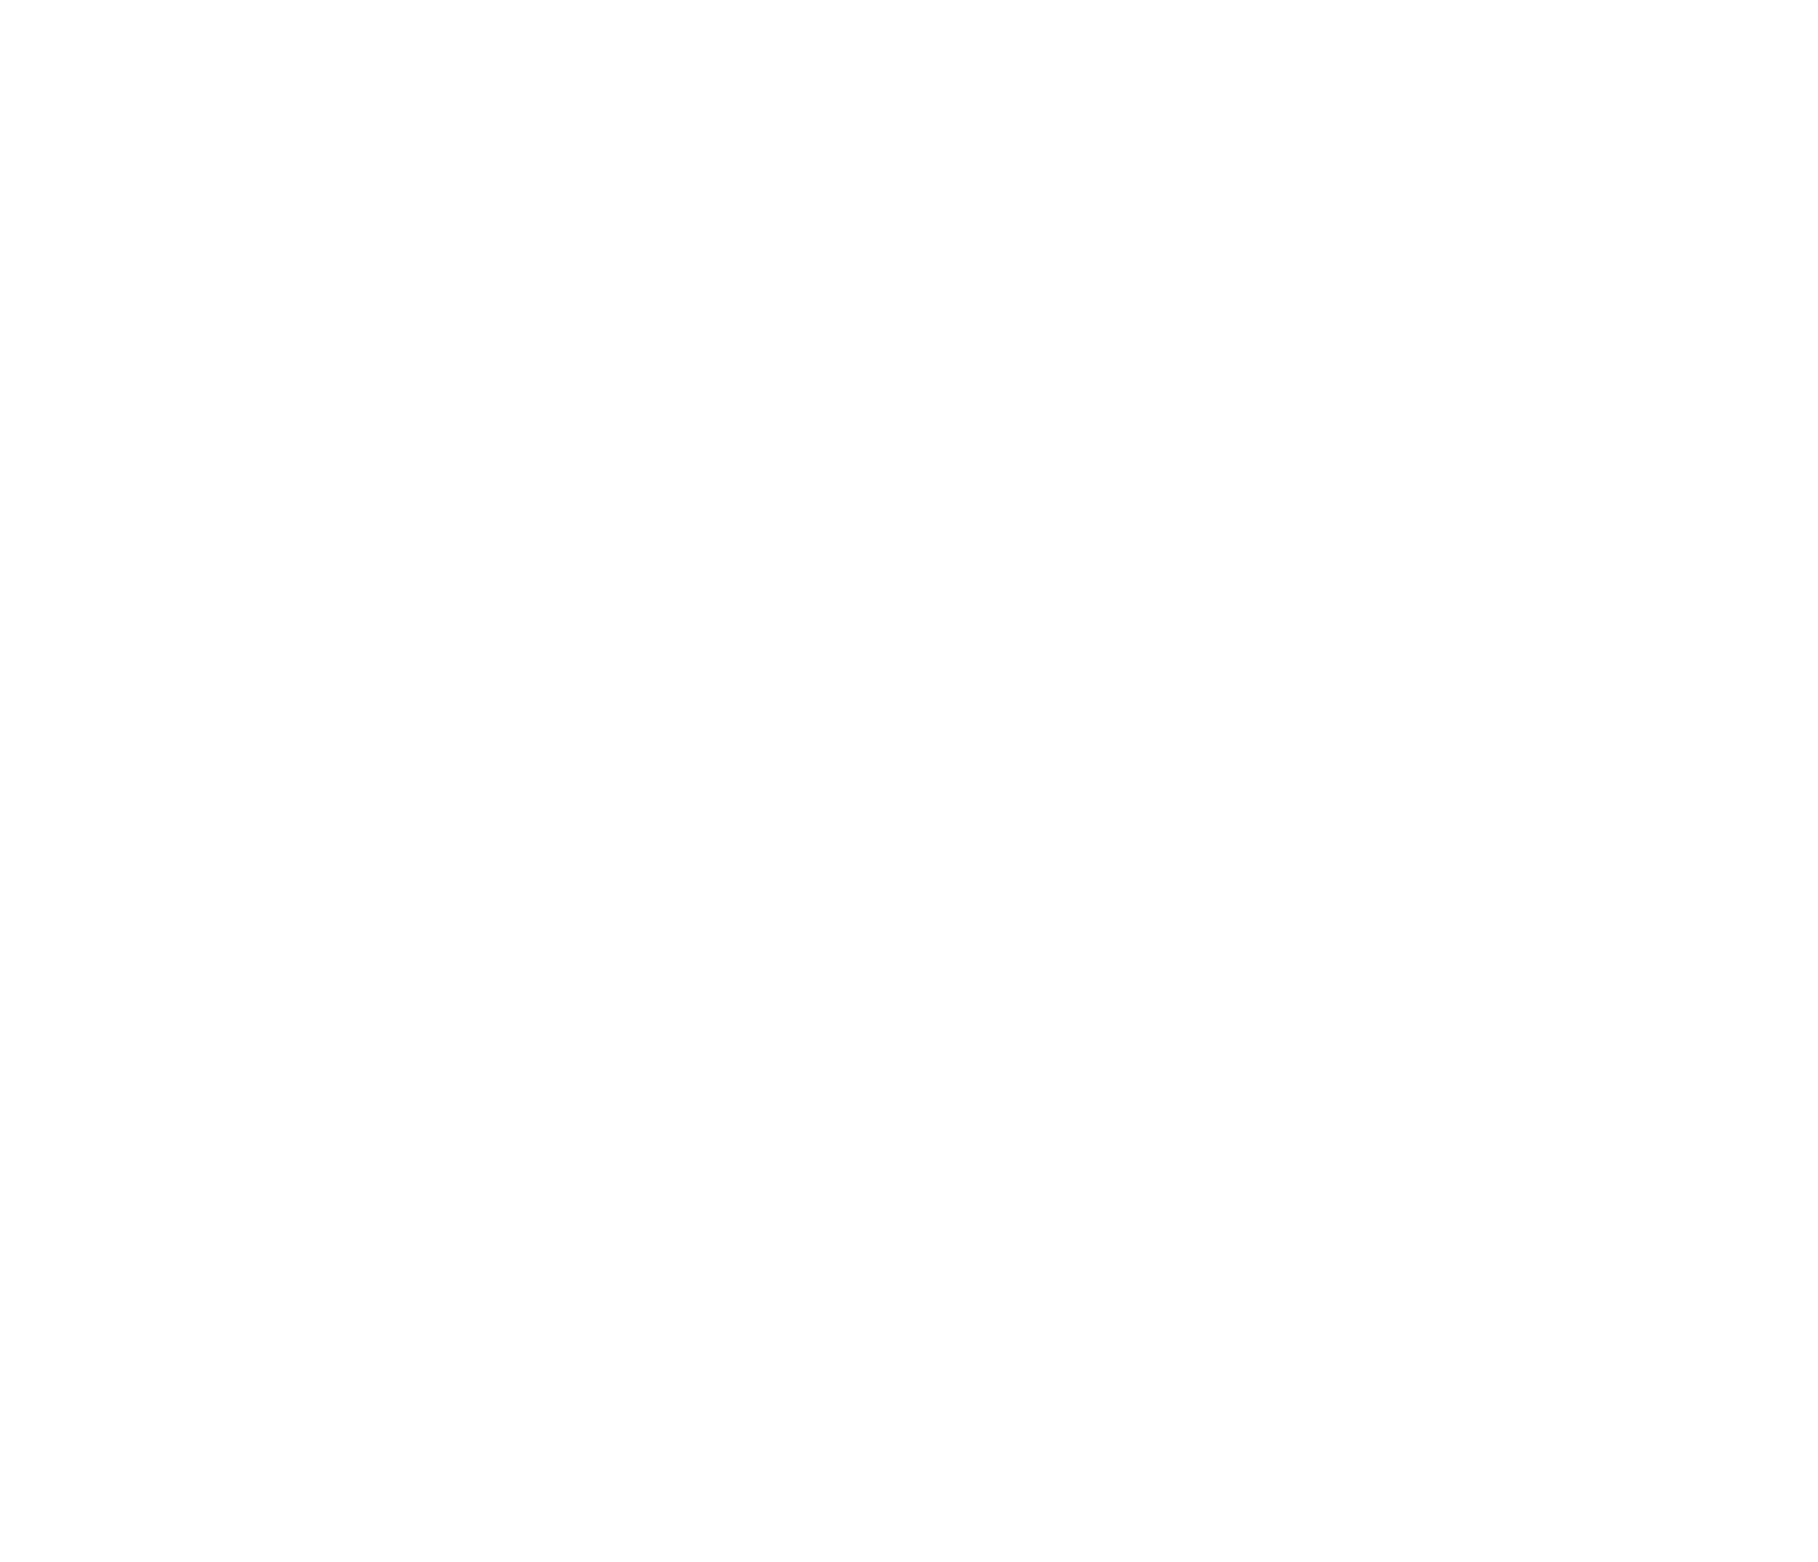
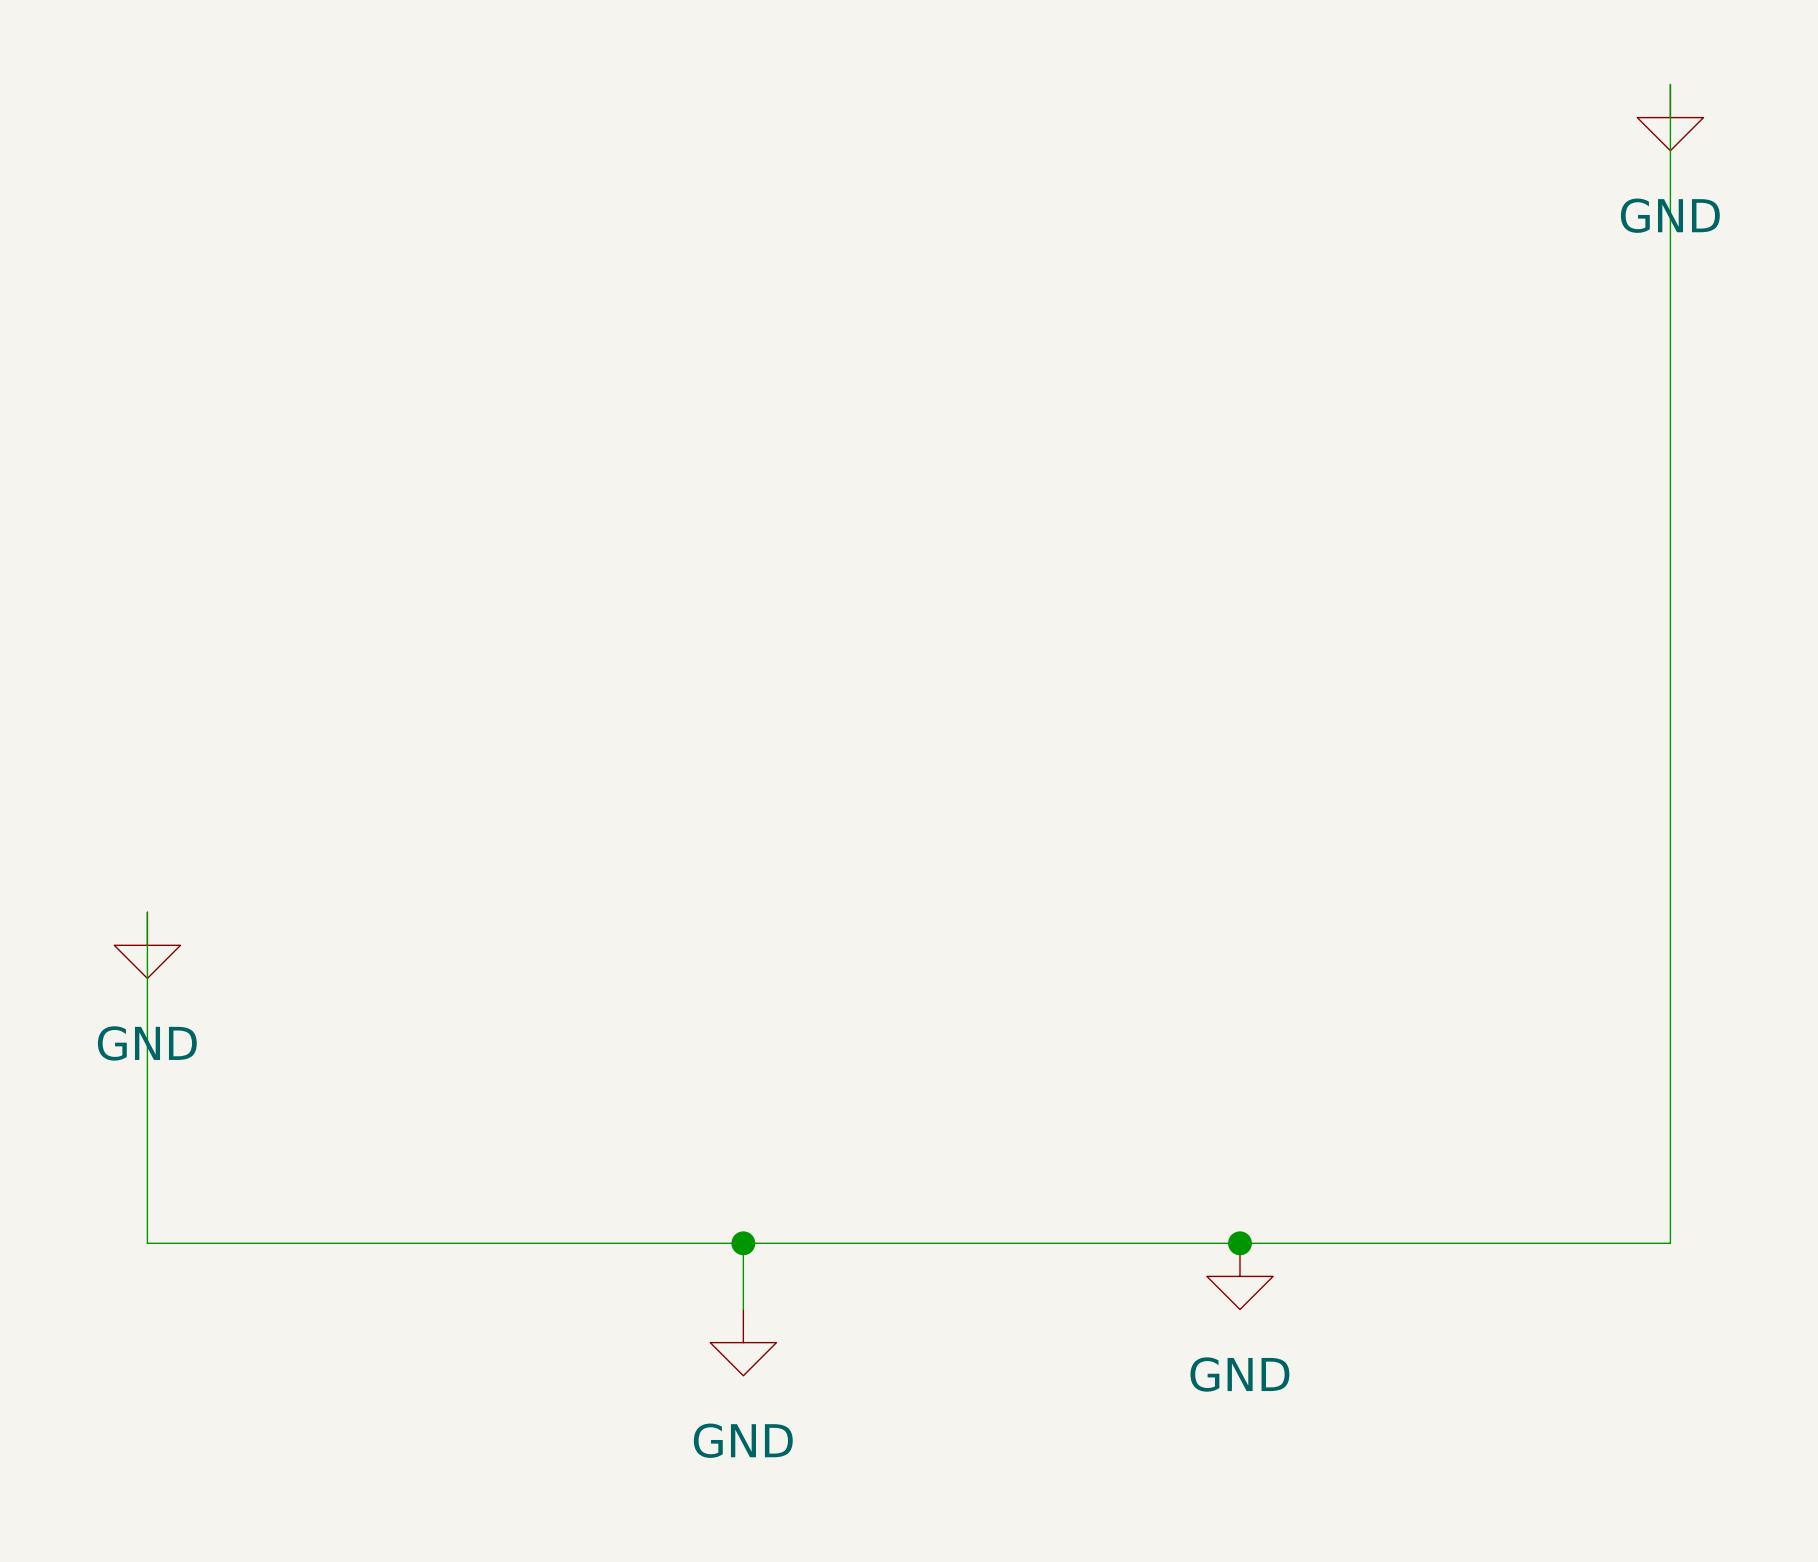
wire: none -> (1670, 84) (1670, 1243) (147, 1243) (147, 912)
power symbol: none -> GND (1670, 117)
power symbol: none -> GND (147, 945)
wire: none -> (743, 1243) (743, 1309)
junction: none -> (743, 1243)
junction: none -> (1239, 1243)
power symbol: none -> GND (1239, 1276)
power symbol: none -> GND (743, 1342)

